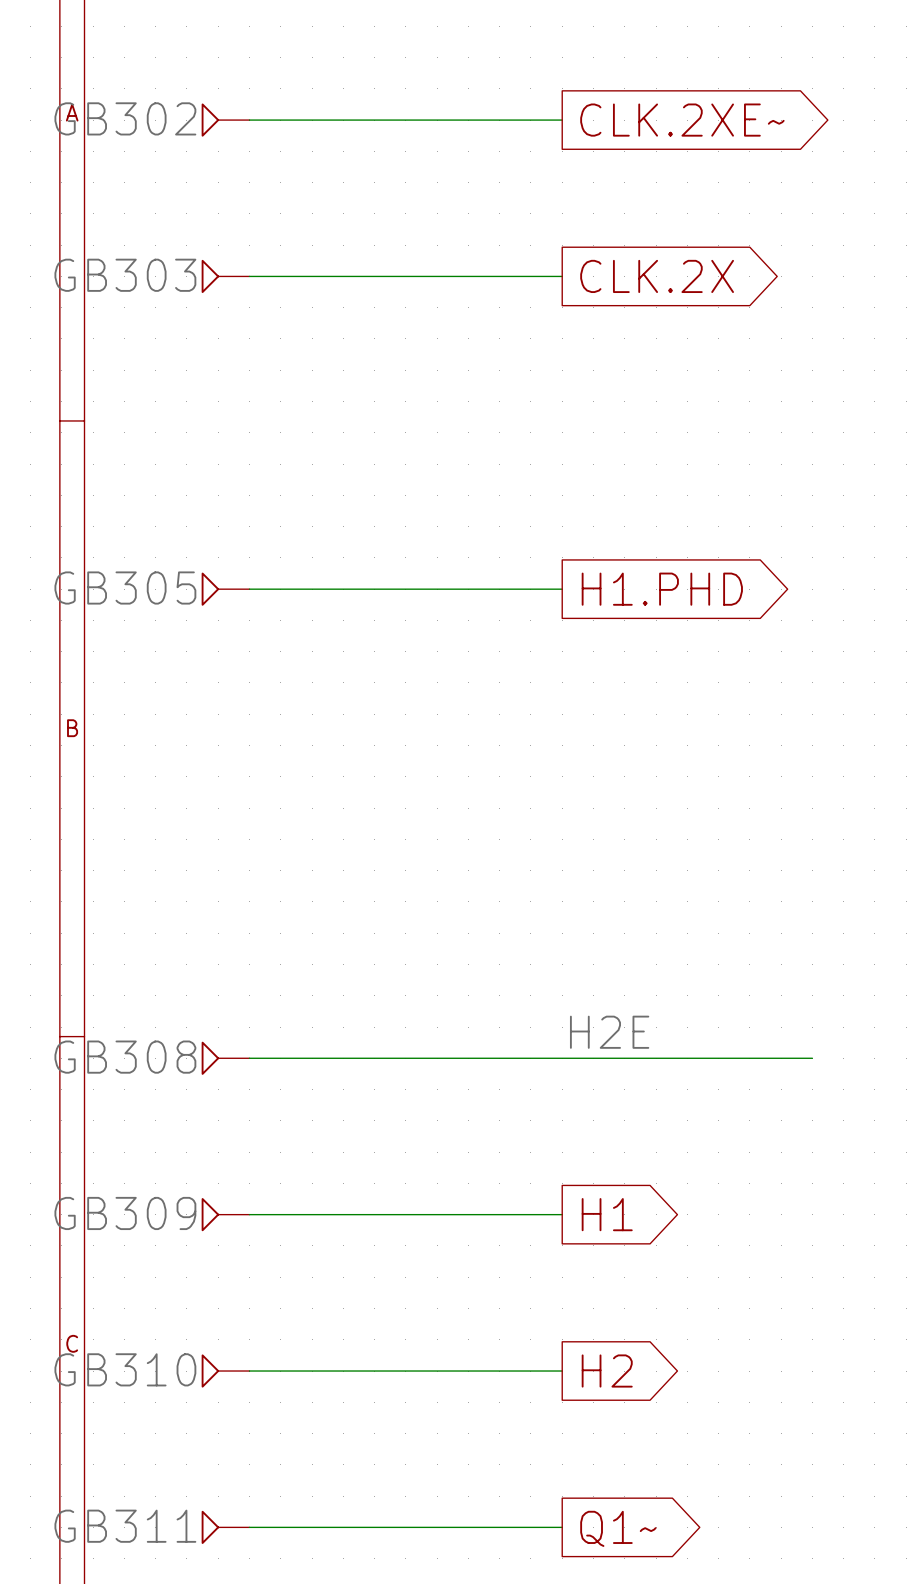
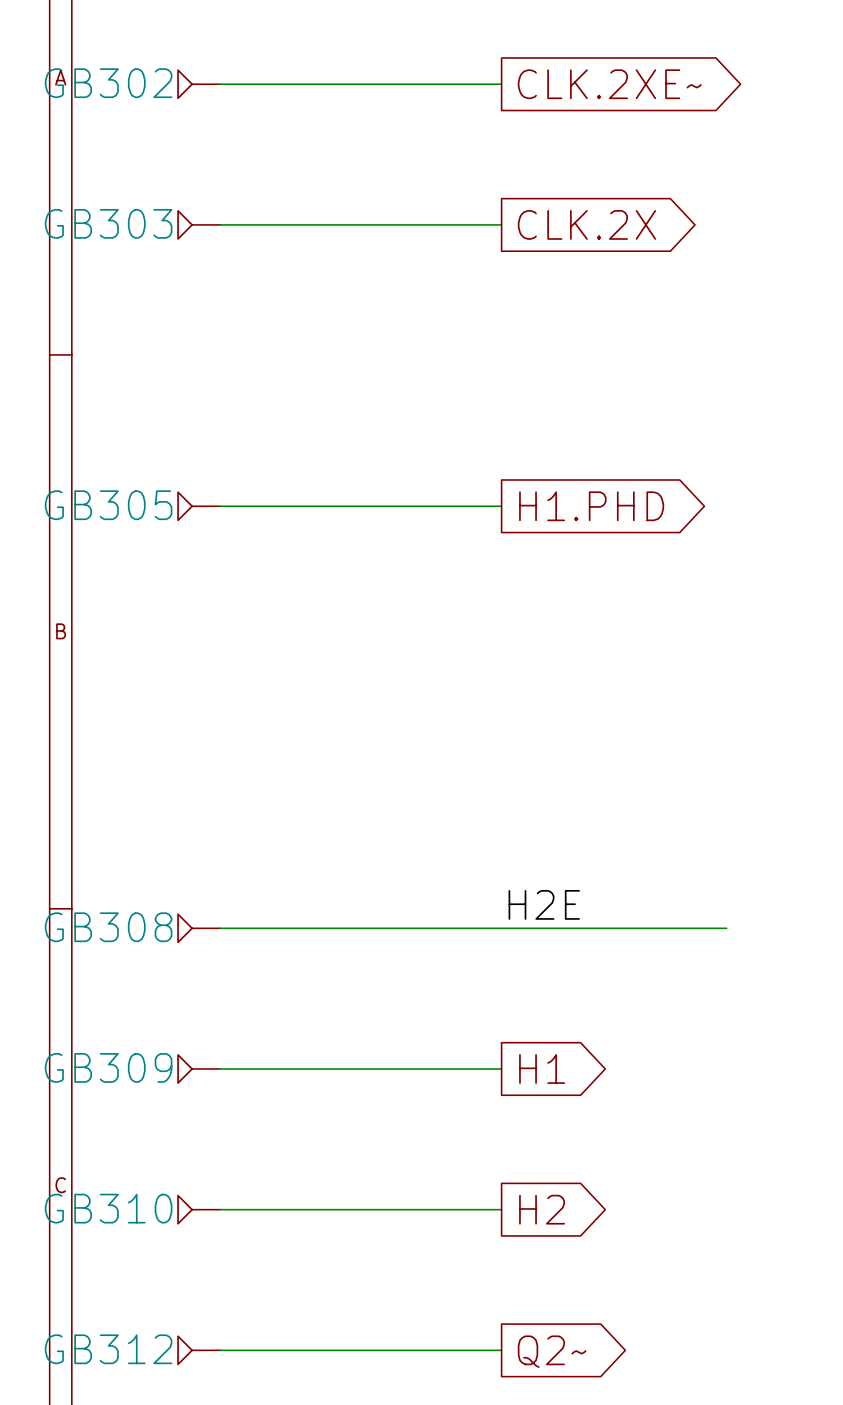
GB311 name: GB311 (125, 1526) -> GB312 (108, 1349)
global label: Q1~ (618, 1528) -> Q2~ (552, 1351)

